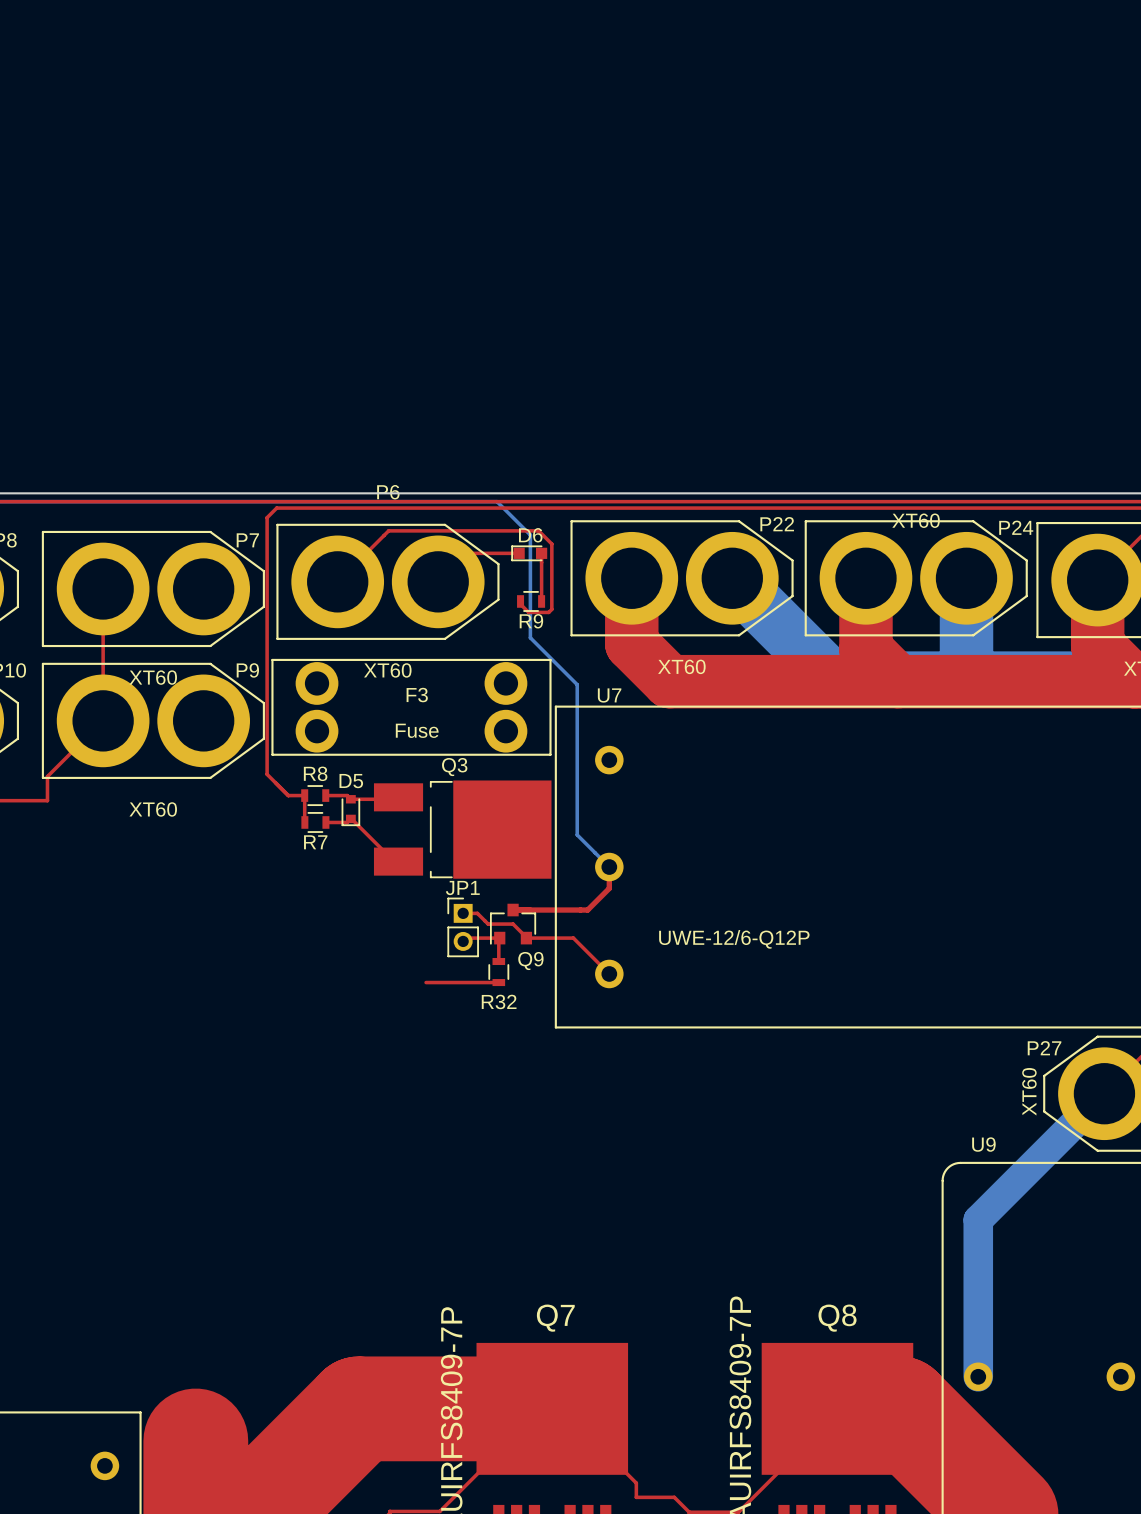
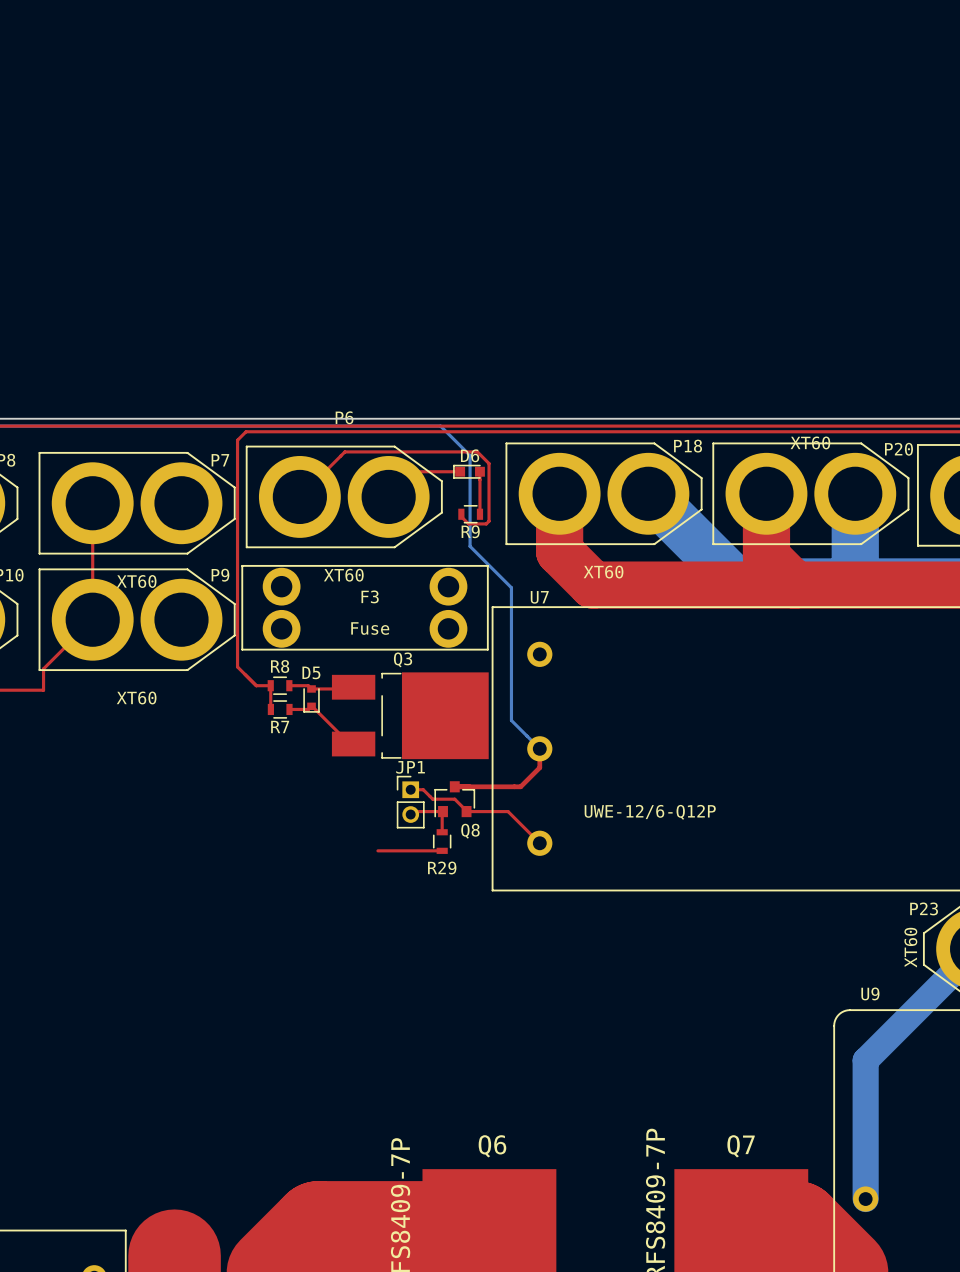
P22 name: P22 (777, 524) -> P18 (688, 446)
P24 name: P24 (1016, 527) -> P20 (898, 449)
Q9 name: Q9 (530, 961) -> Q8 (470, 831)
R32 name: R32 (499, 1001) -> R29 (442, 868)
P27 name: P27 (1044, 1048) -> P23 (924, 908)
Q7 name: Q7 (555, 1318) -> Q6 (492, 1146)
Q8 name: Q8 (837, 1318) -> Q7 (741, 1146)

